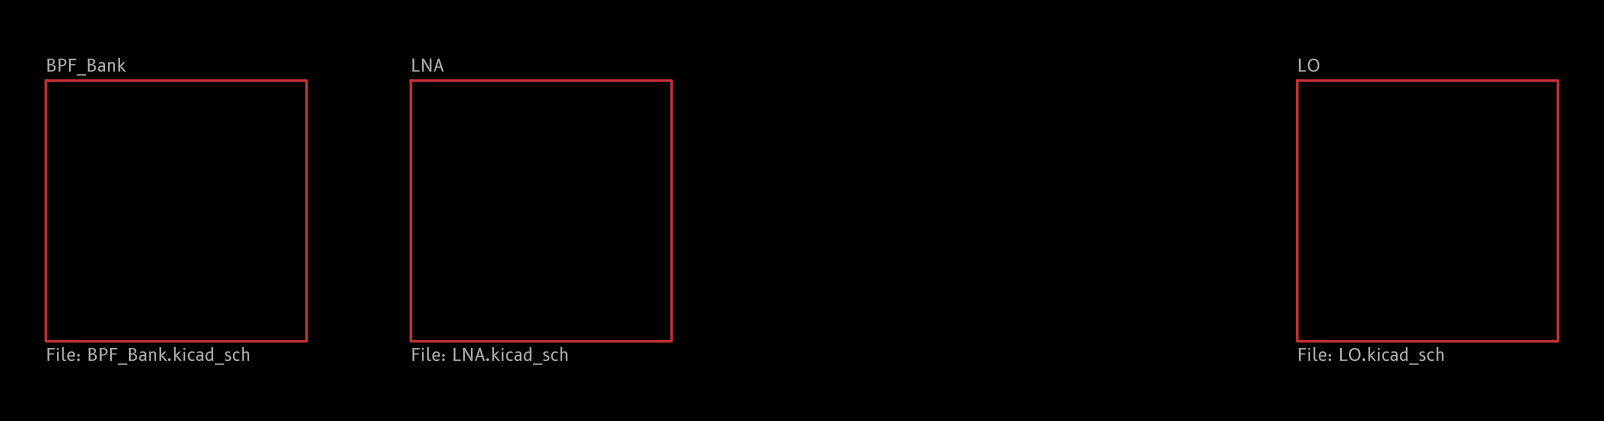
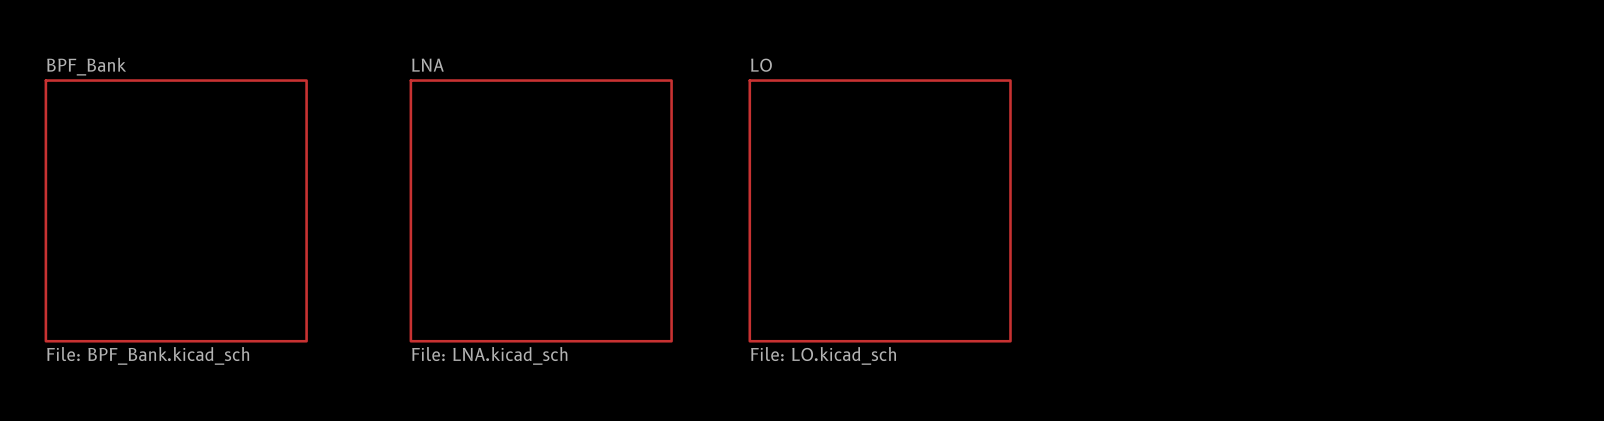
sheet LO: none -> File: LO.kicad_sch (880, 210)
sheet LO: File: LO.kicad_sch (1427, 210) -> none

